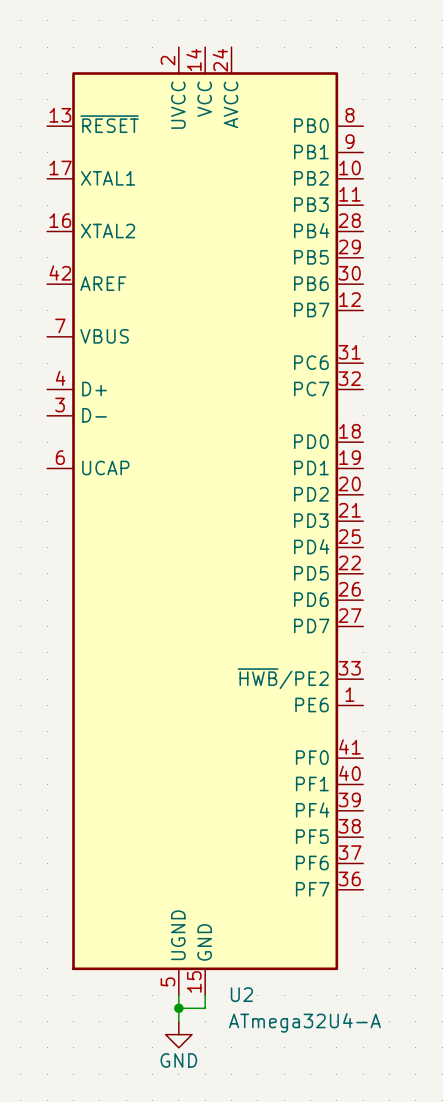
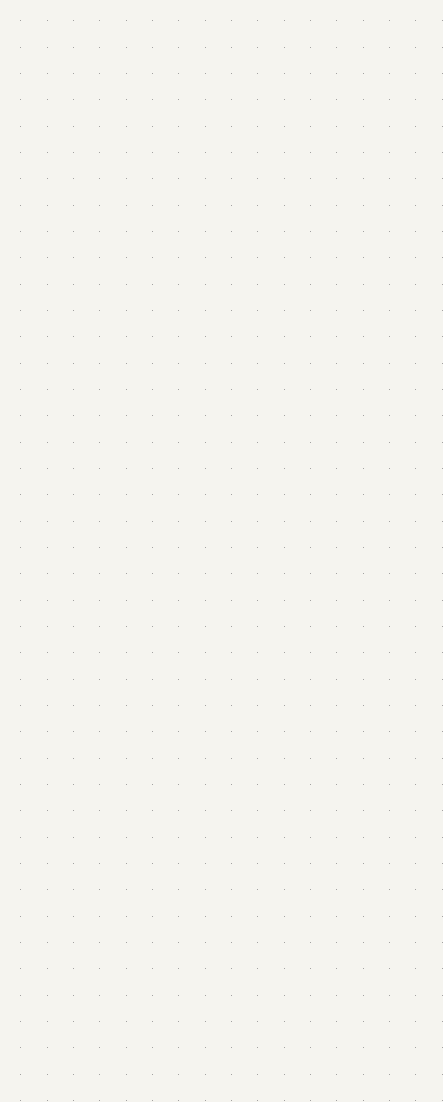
U2: ATmega32U4-A (205, 521) -> none
wire: (178, 995) (178, 1021) -> none
wire: (205, 995) (205, 1008) (178, 1008) -> none
junction: (178, 1008) -> none
power symbol: GND (178, 1034) -> none

